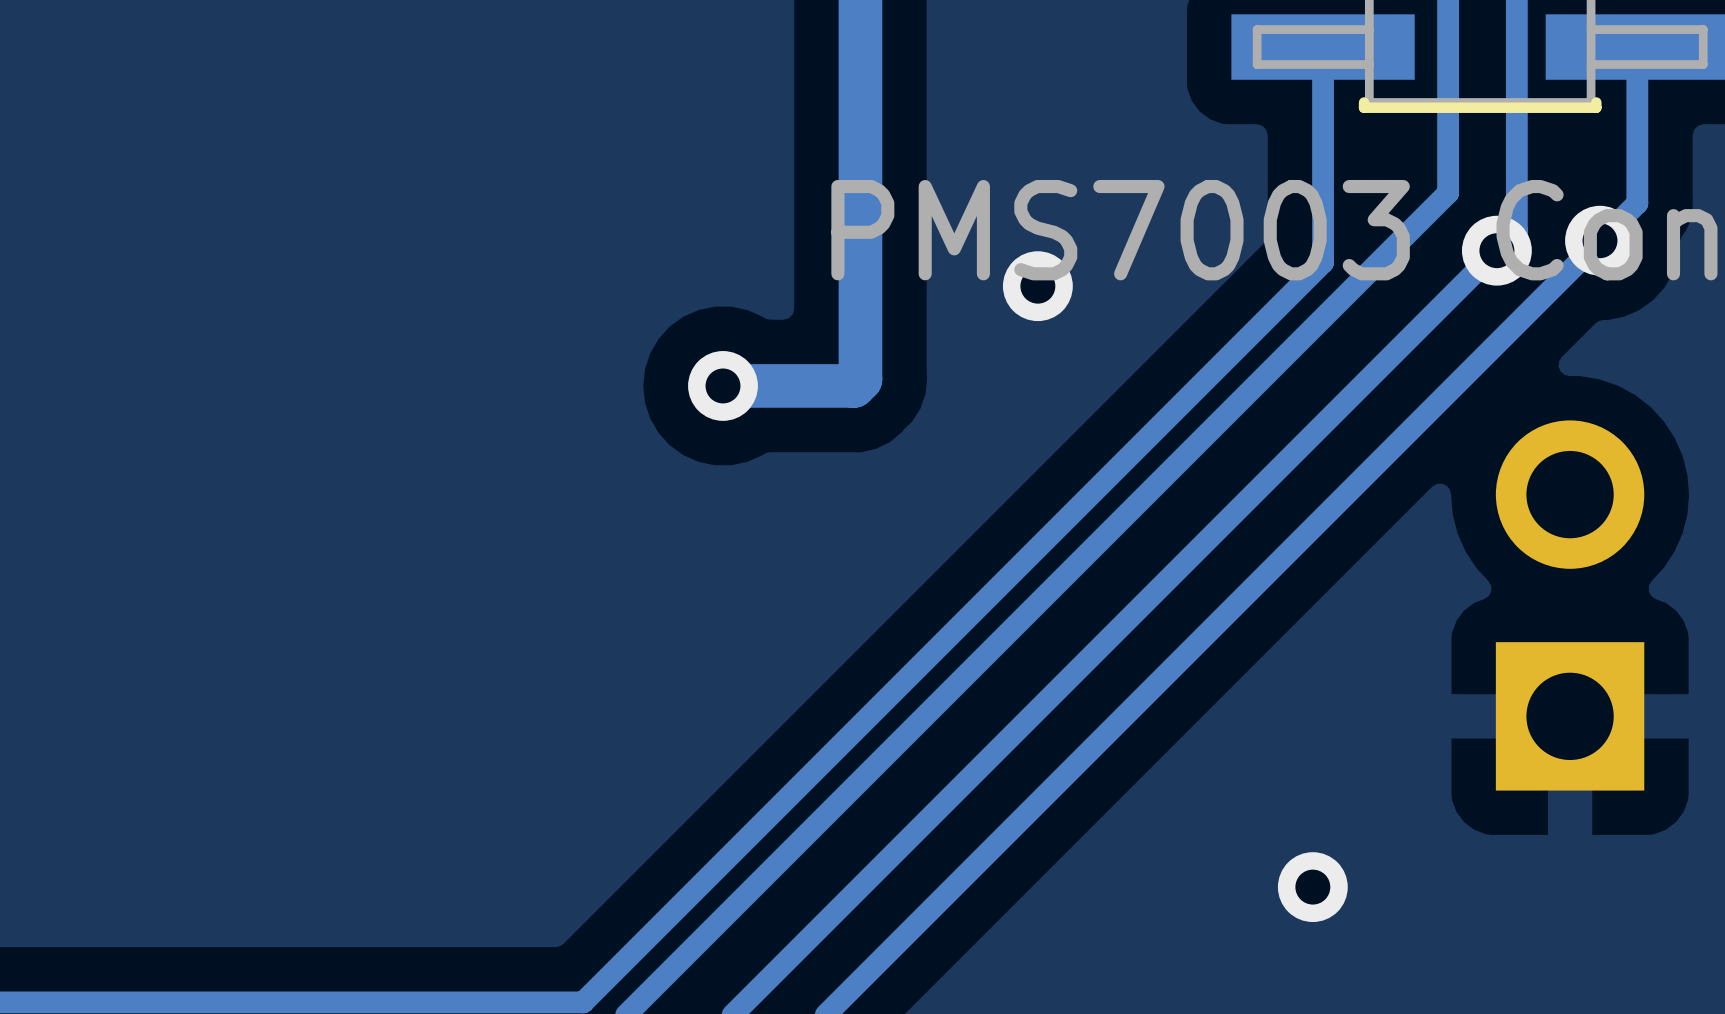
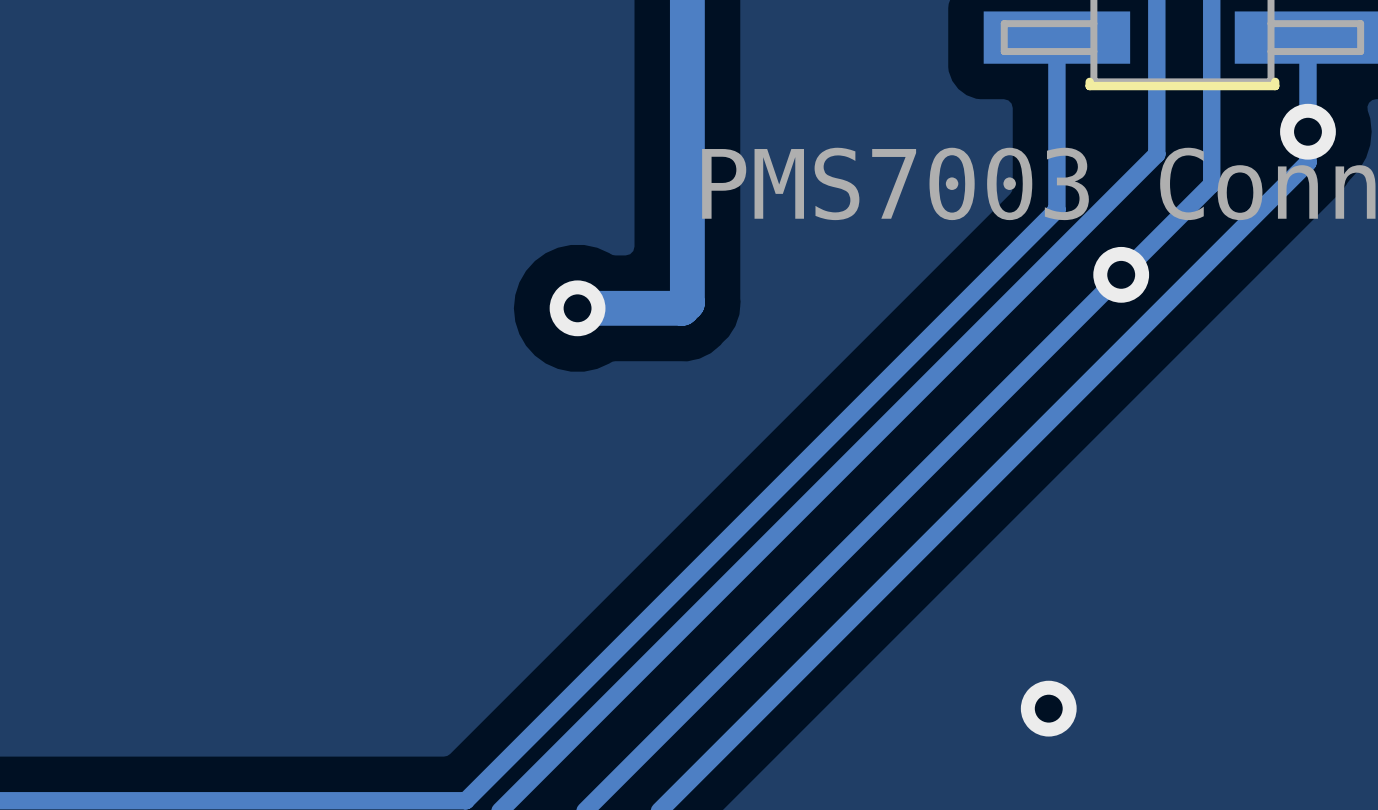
via: none -> (1307, 131)
via: (1600, 240) -> none
via: (1496, 250) -> none
via: (1037, 286) -> none
via: none -> (1121, 274)
part: (1570, 605) -> none

